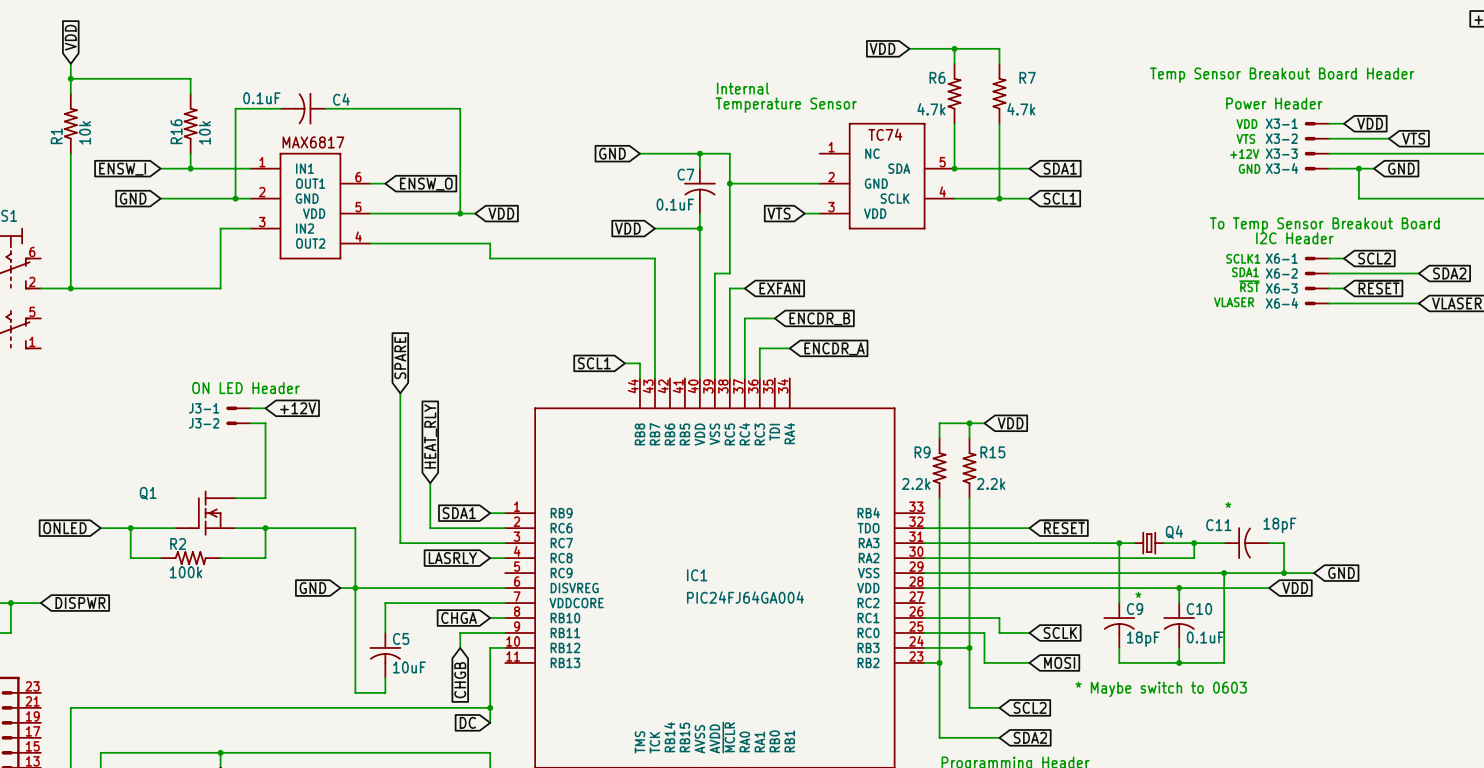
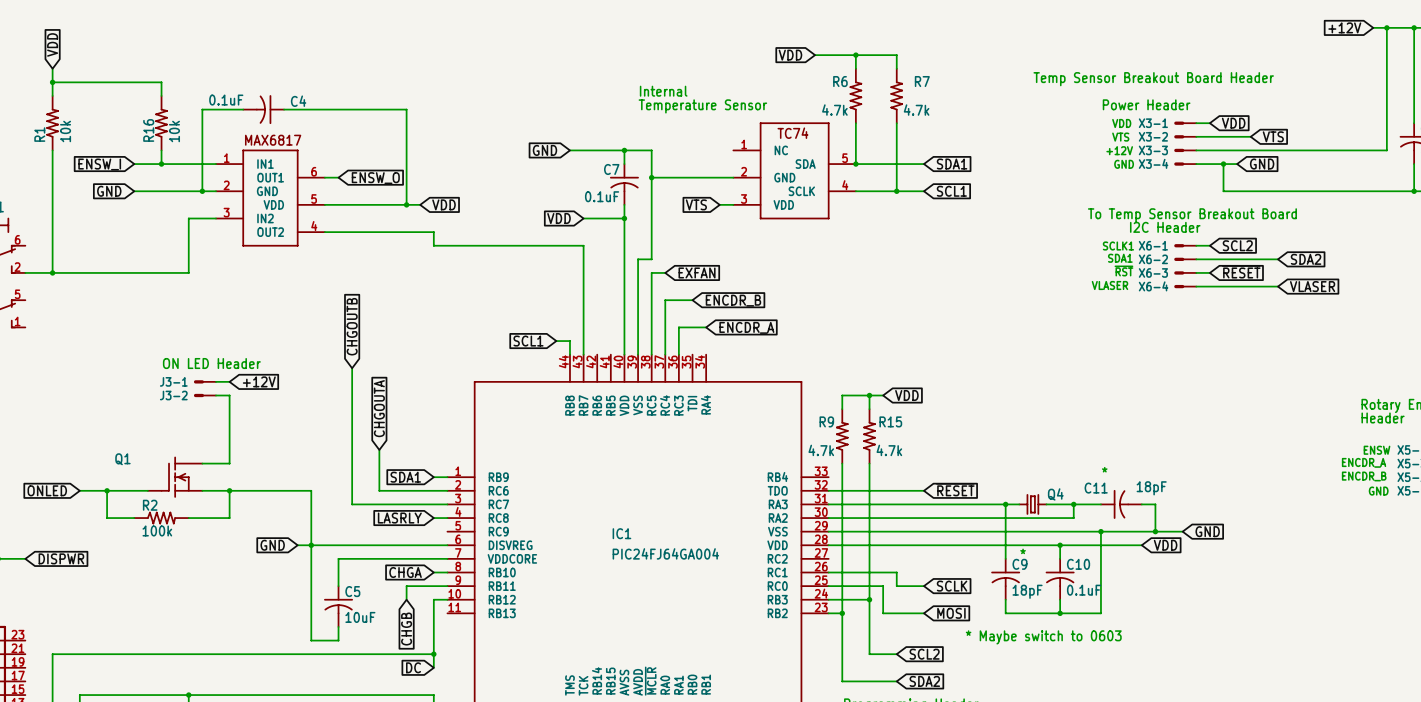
global label: SPARE (400, 357) -> CHGOUTB (352, 326)
global label: HEAT_RLY (430, 436) -> CHGOUTA (379, 408)
R9 value: 2.2k (916, 483) -> 4.7k (821, 450)
R15 value: 2.2k (991, 483) -> 4.7k (889, 450)

